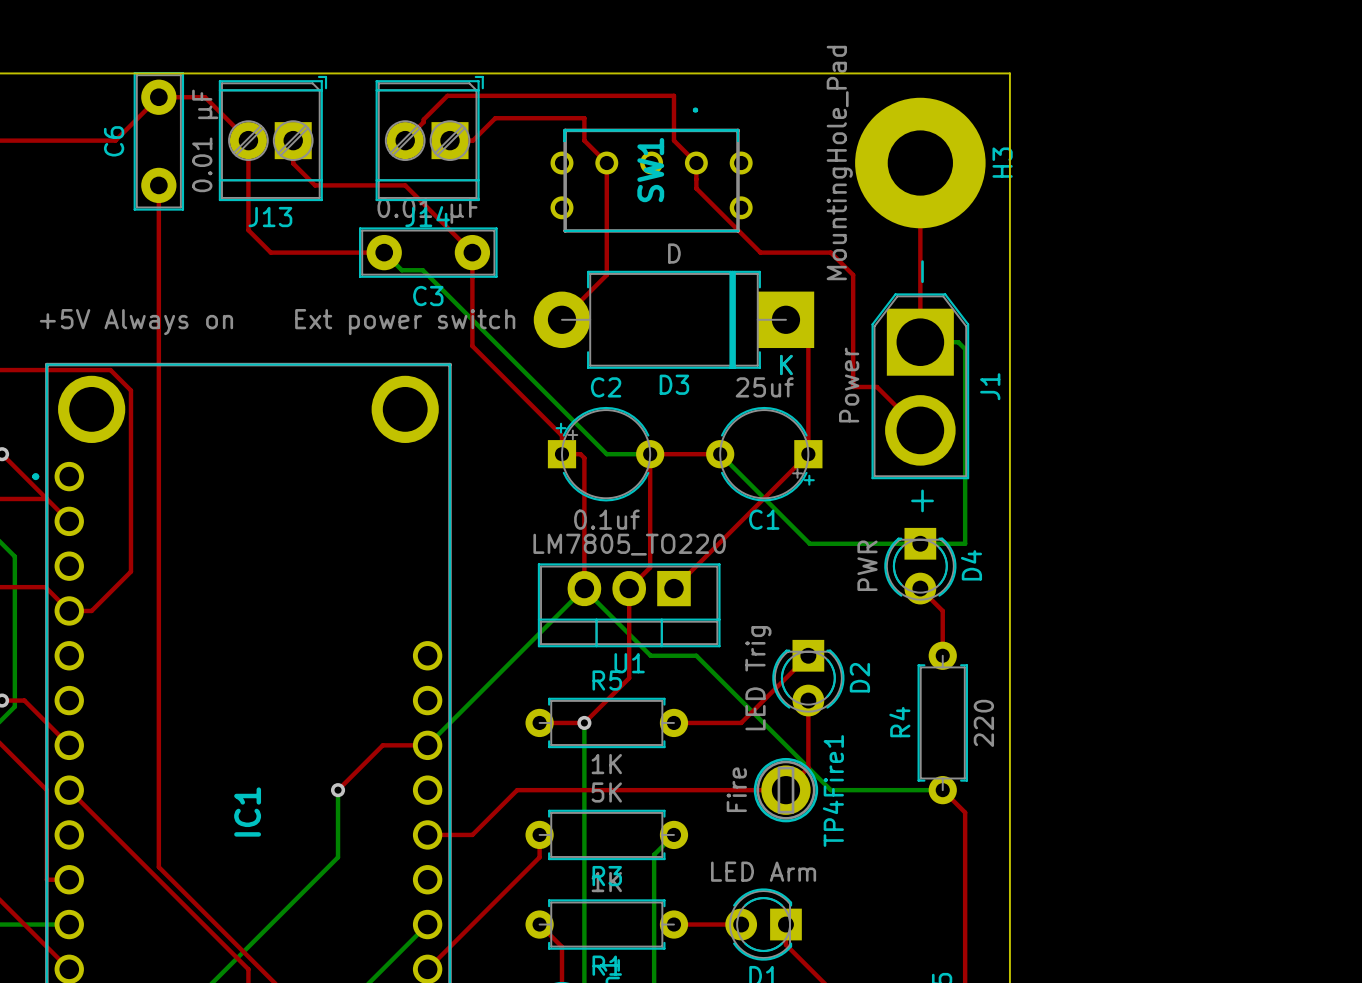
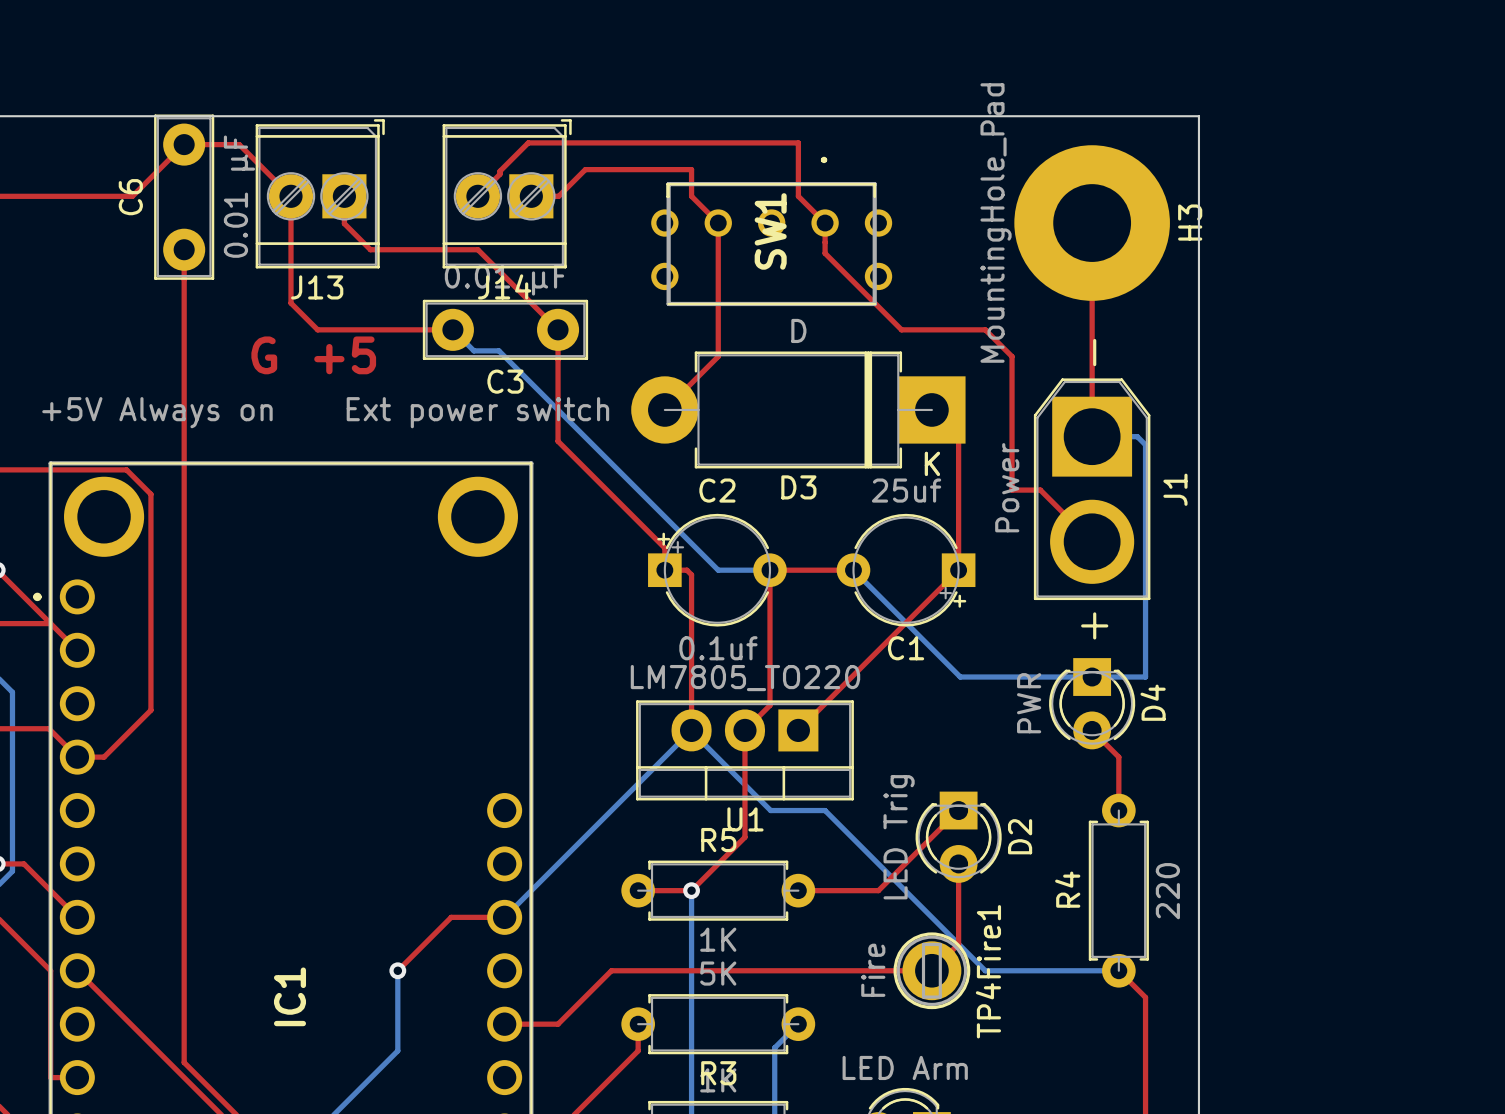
text: none -> G (264, 355)
text: none -> +5 (345, 355)

